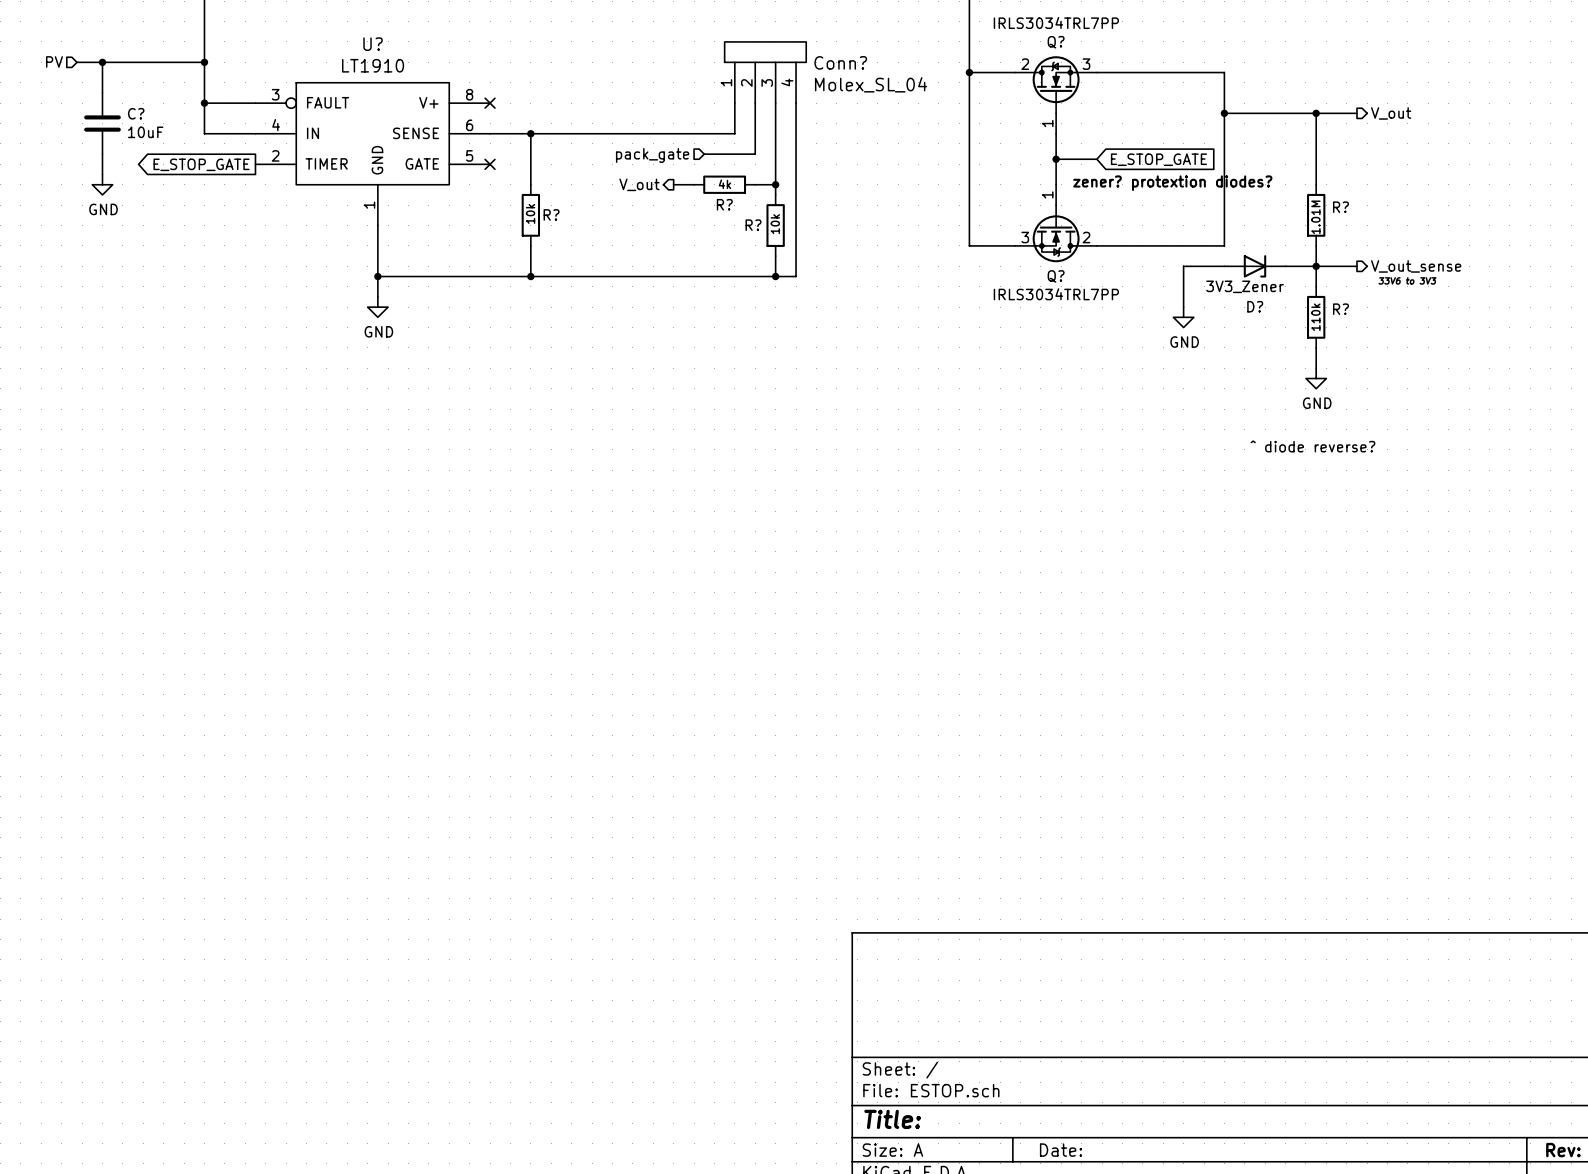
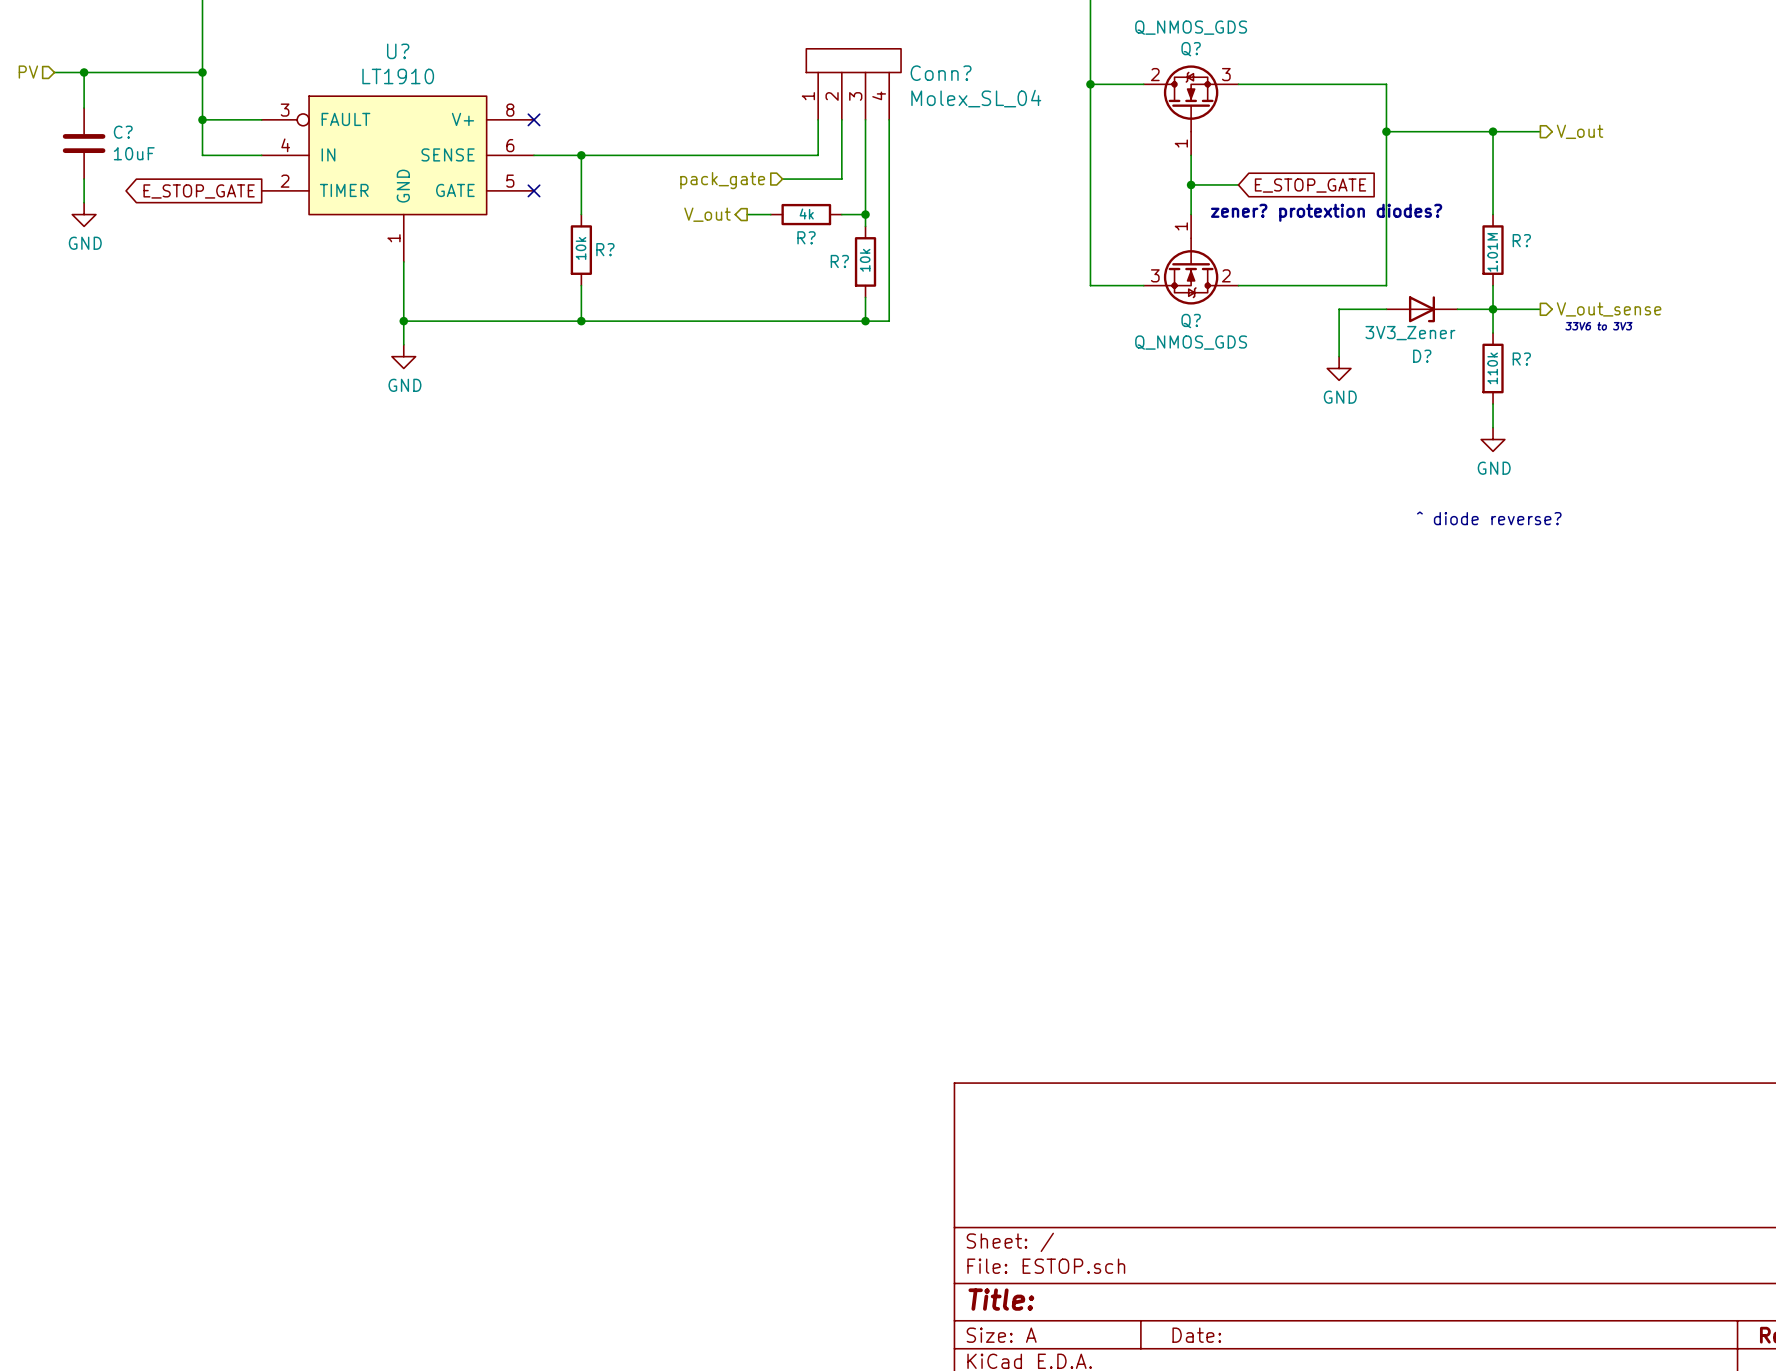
Q? value: IRLS3034TRL7PP (1056, 22) -> Q_NMOS_GDS (1191, 27)
Q? value: IRLS3034TRL7PP (1056, 294) -> Q_NMOS_GDS (1191, 342)

